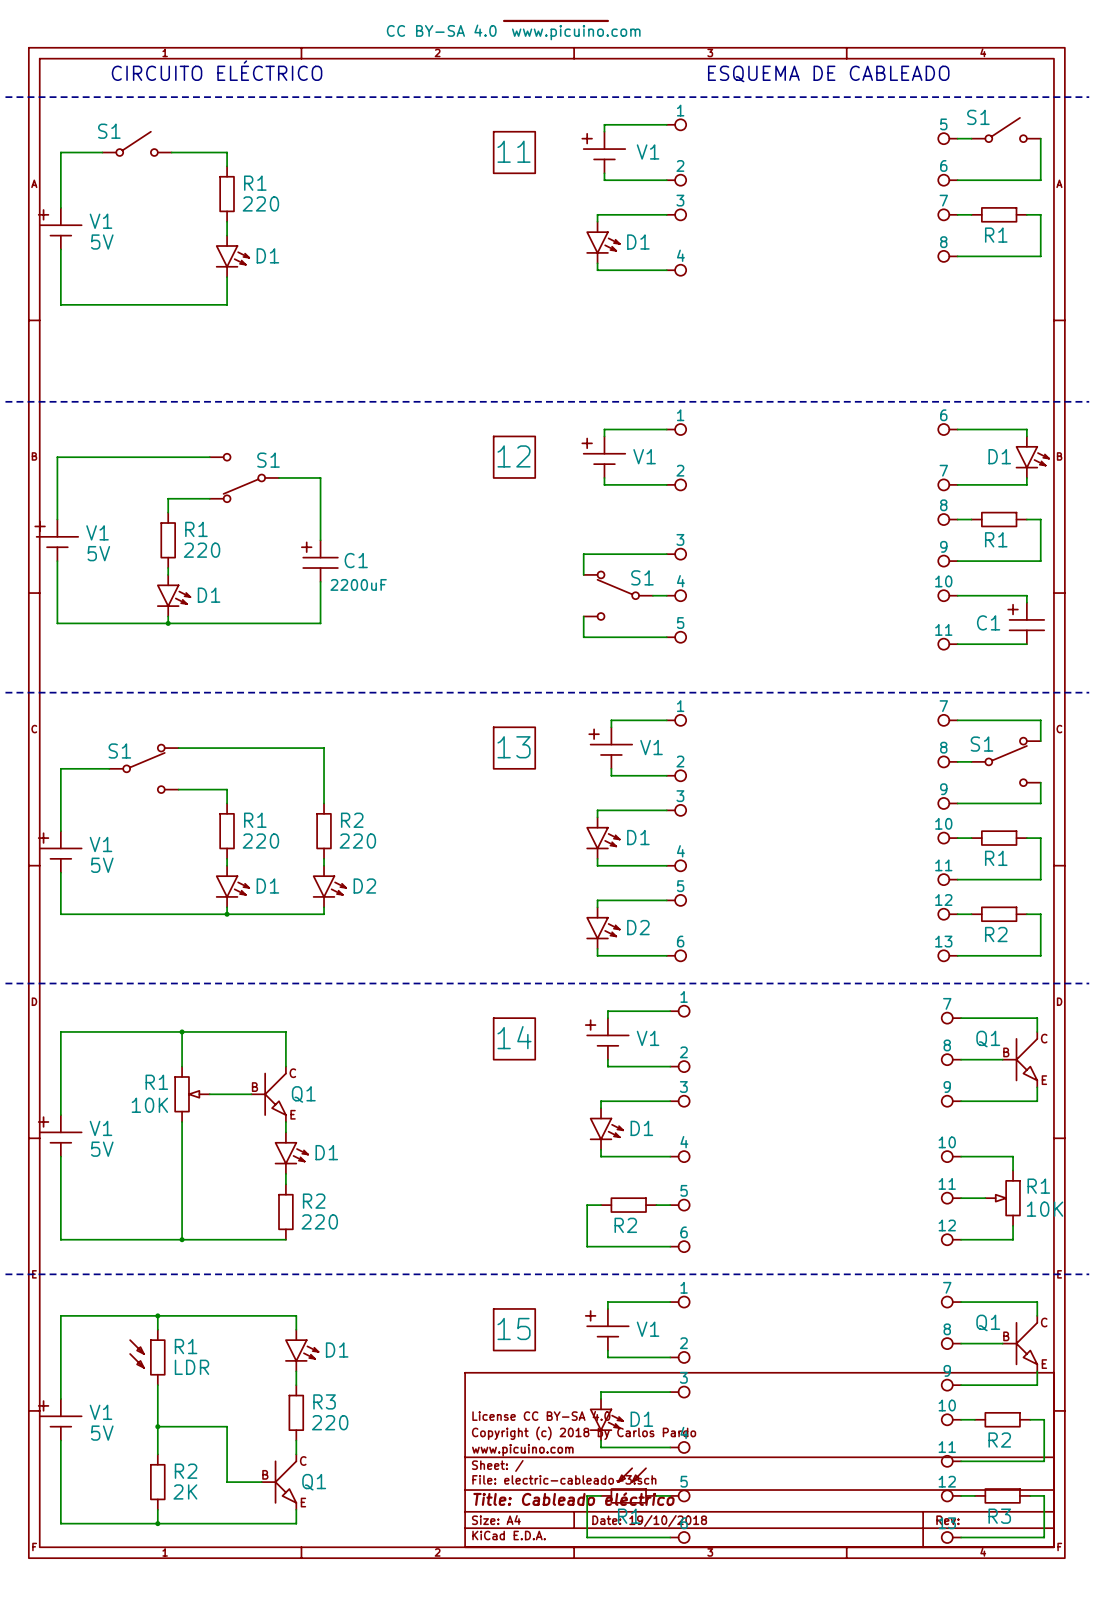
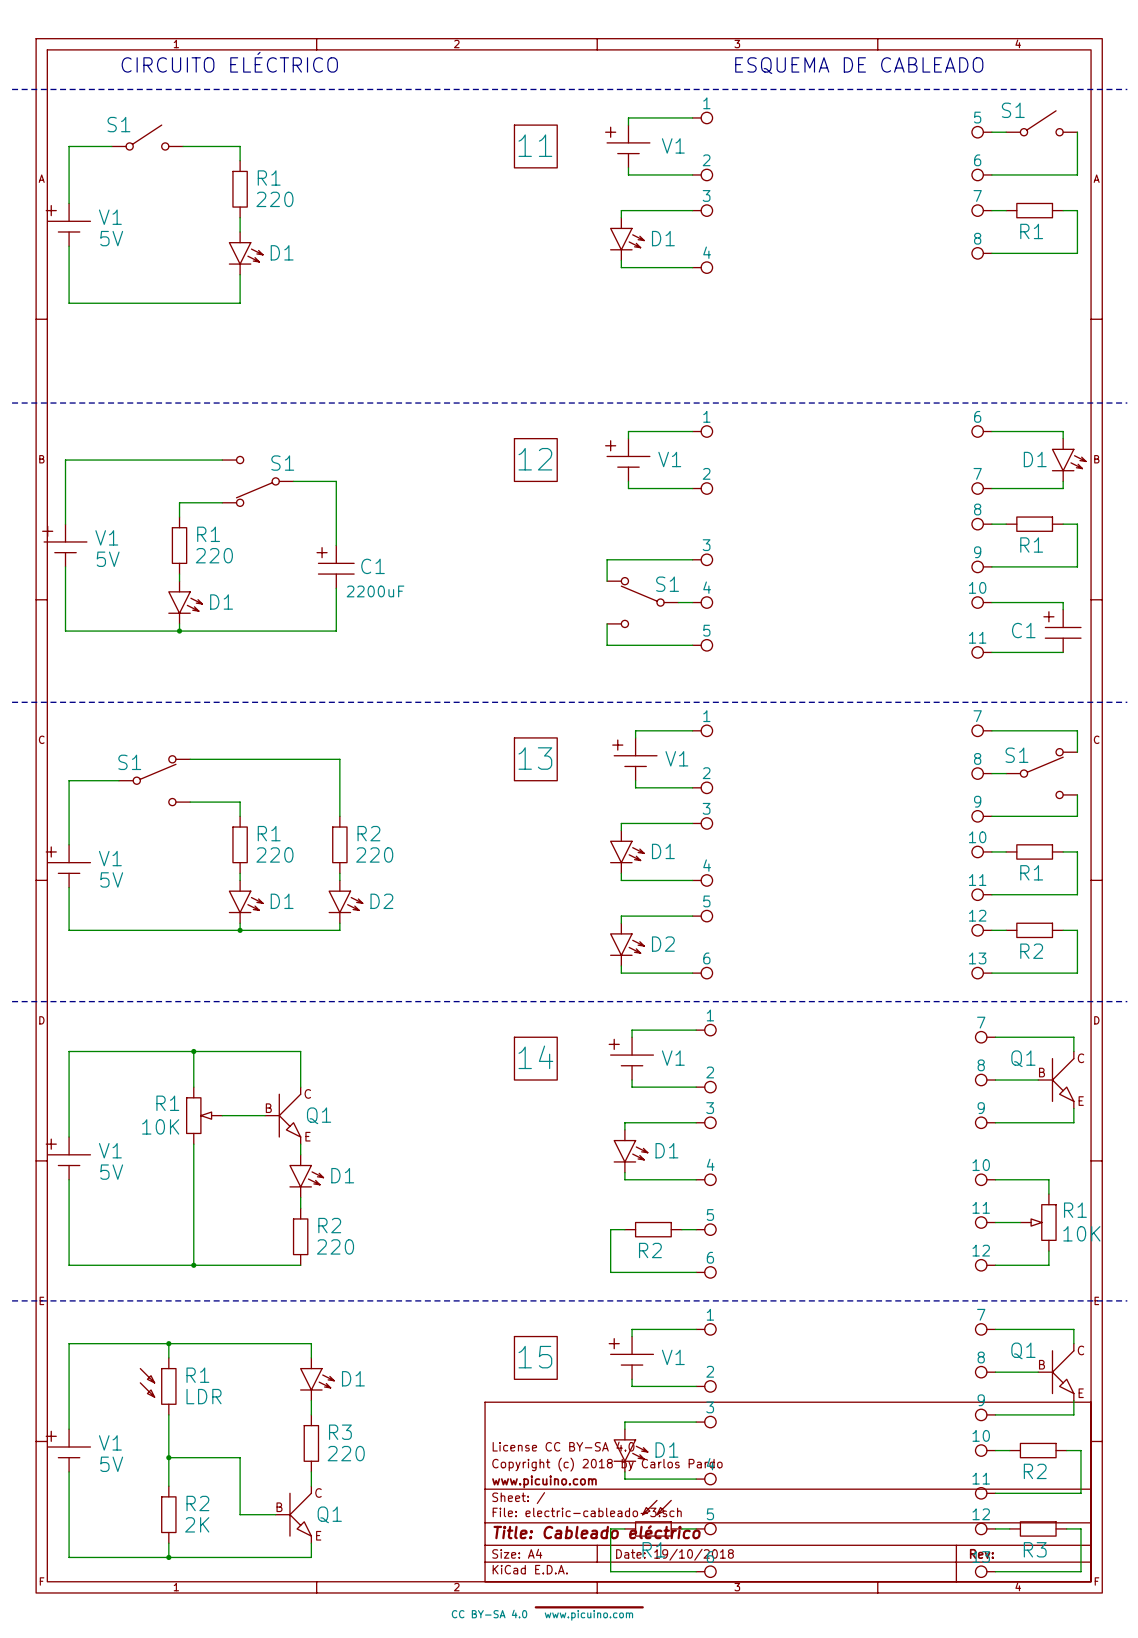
part: (556, 20) -> none
part: none -> (589, 1607)

